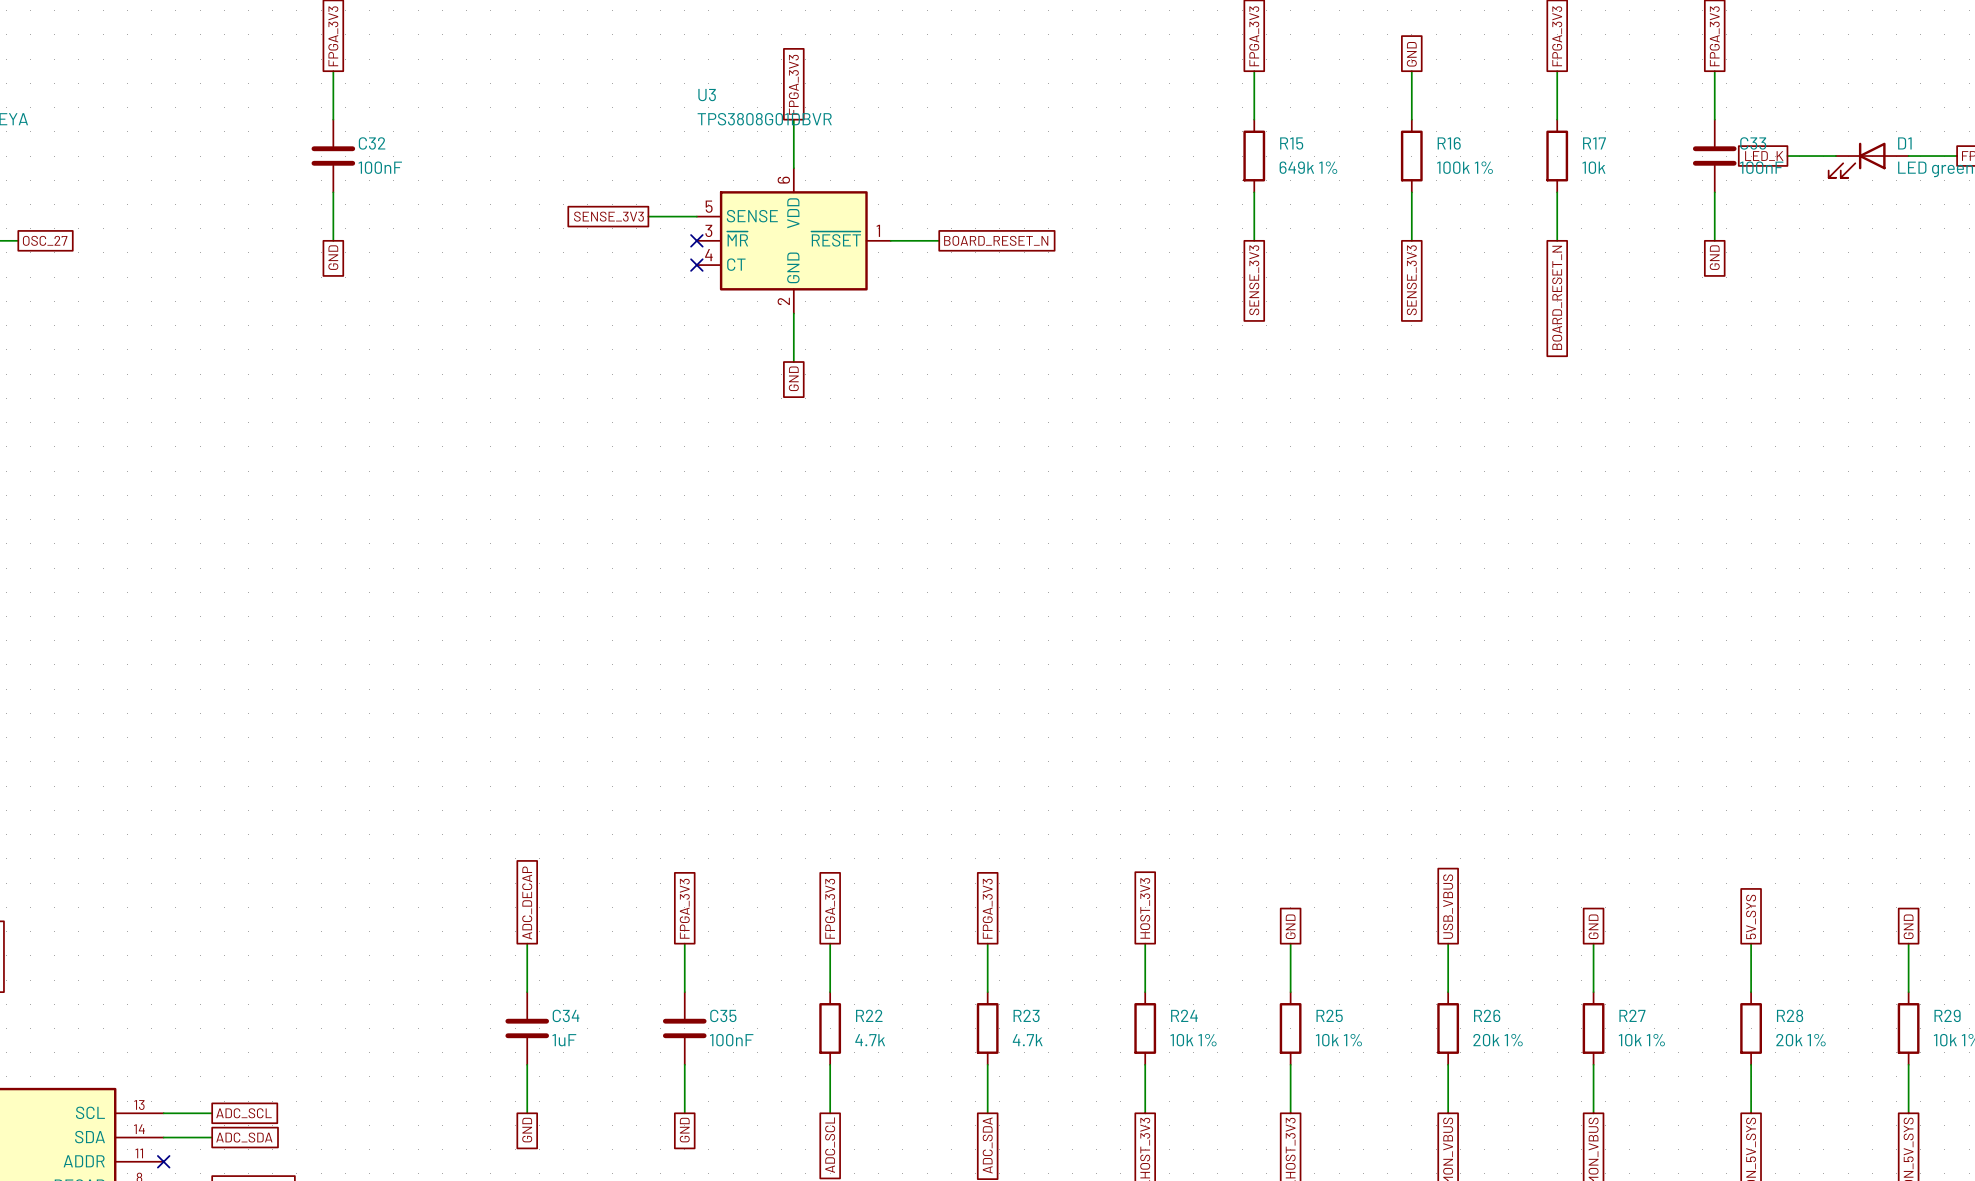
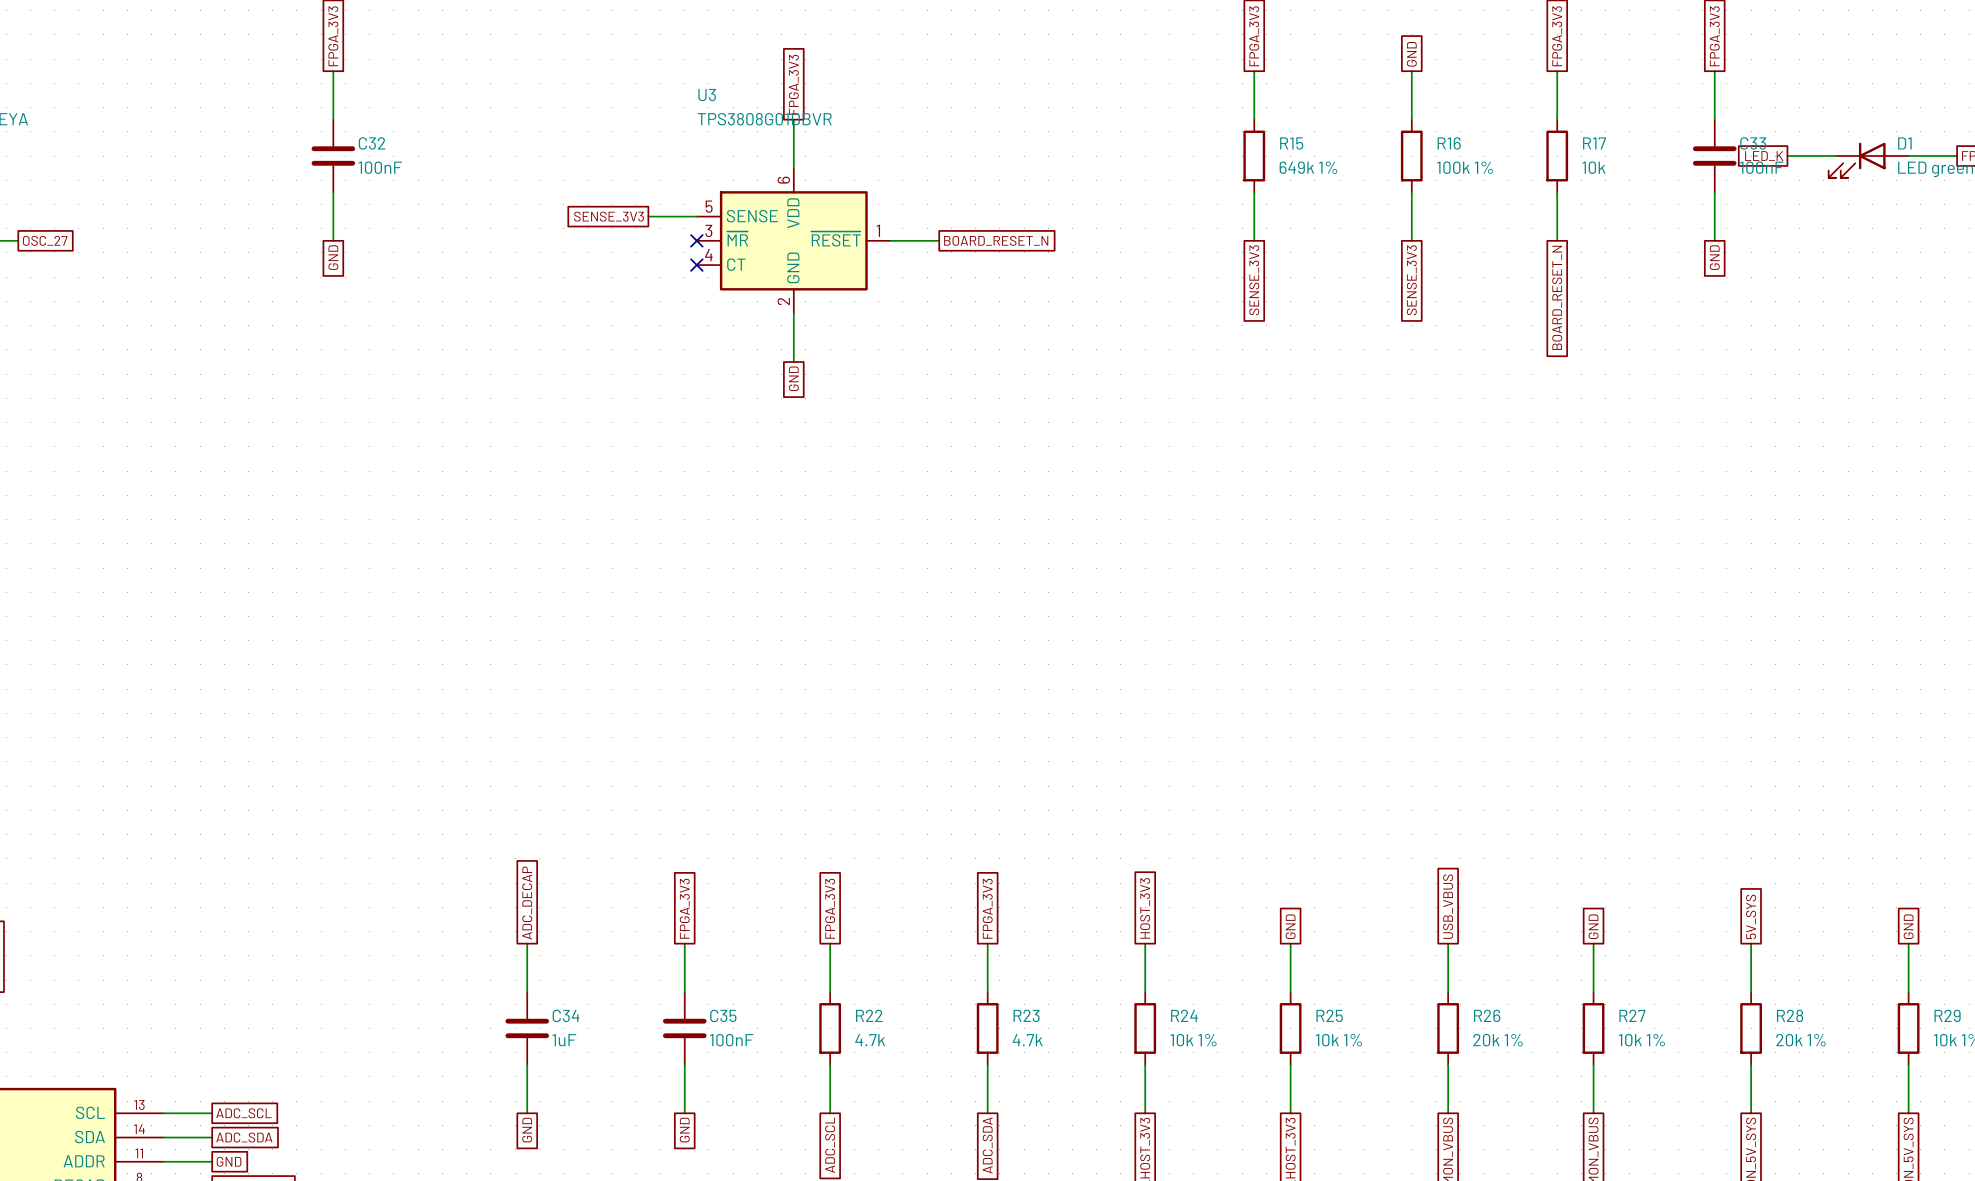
wire: none -> (163, 1161) (212, 1161)
no-connect mark: (163, 1161) -> none
global label: none -> GND (229, 1161)

